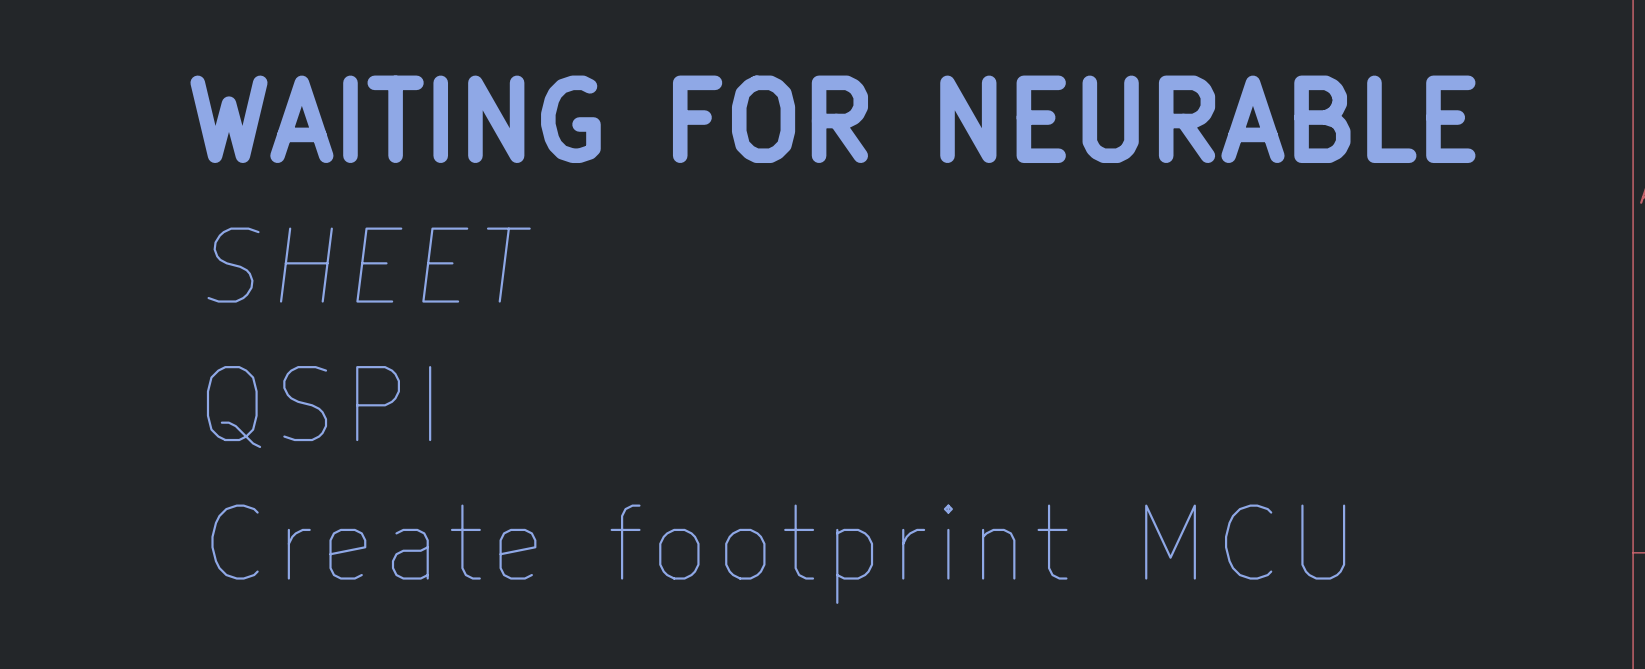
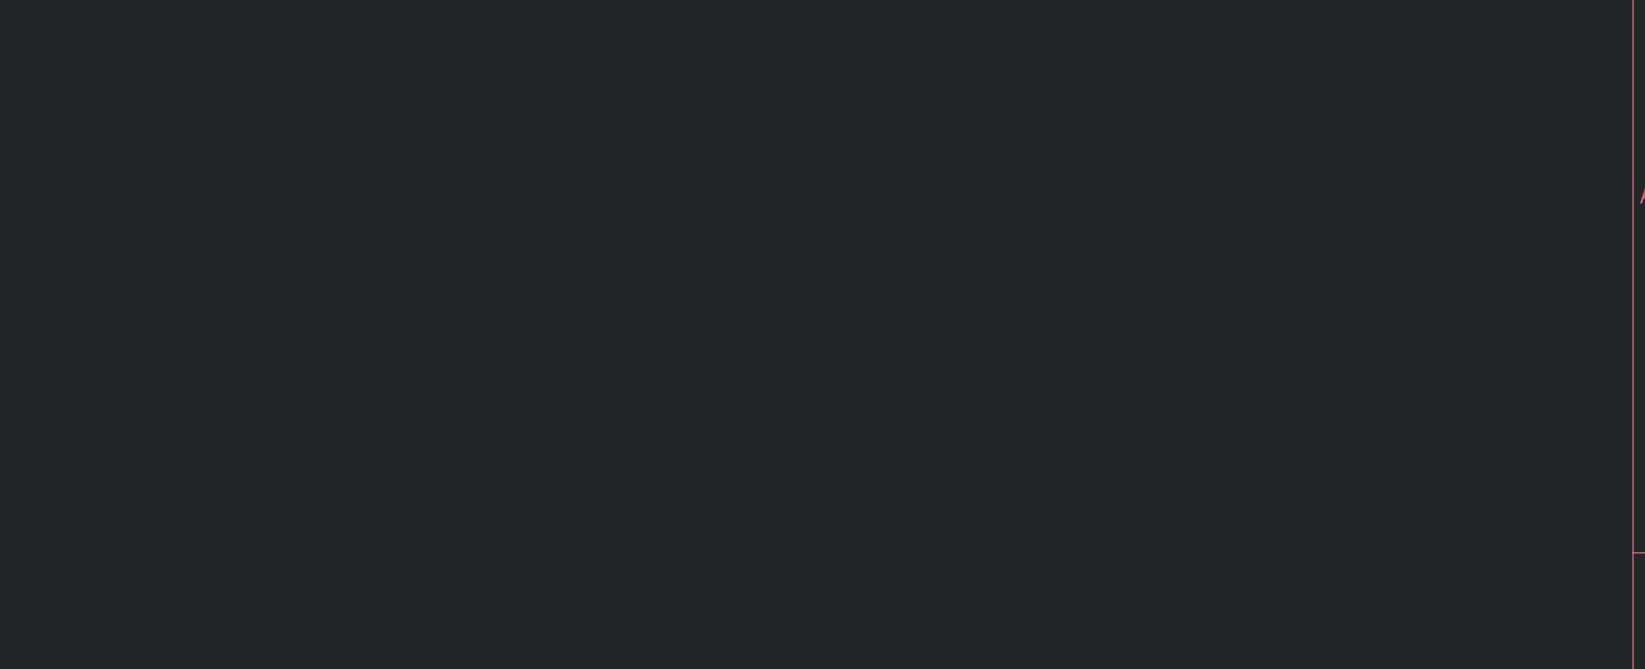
text: WAITING FOR NEURABLE (832, 119) -> none
text: SHEET (369, 265) -> none
text: QSPI (319, 407) -> none
text: Create footprint MCU (778, 554) -> none

